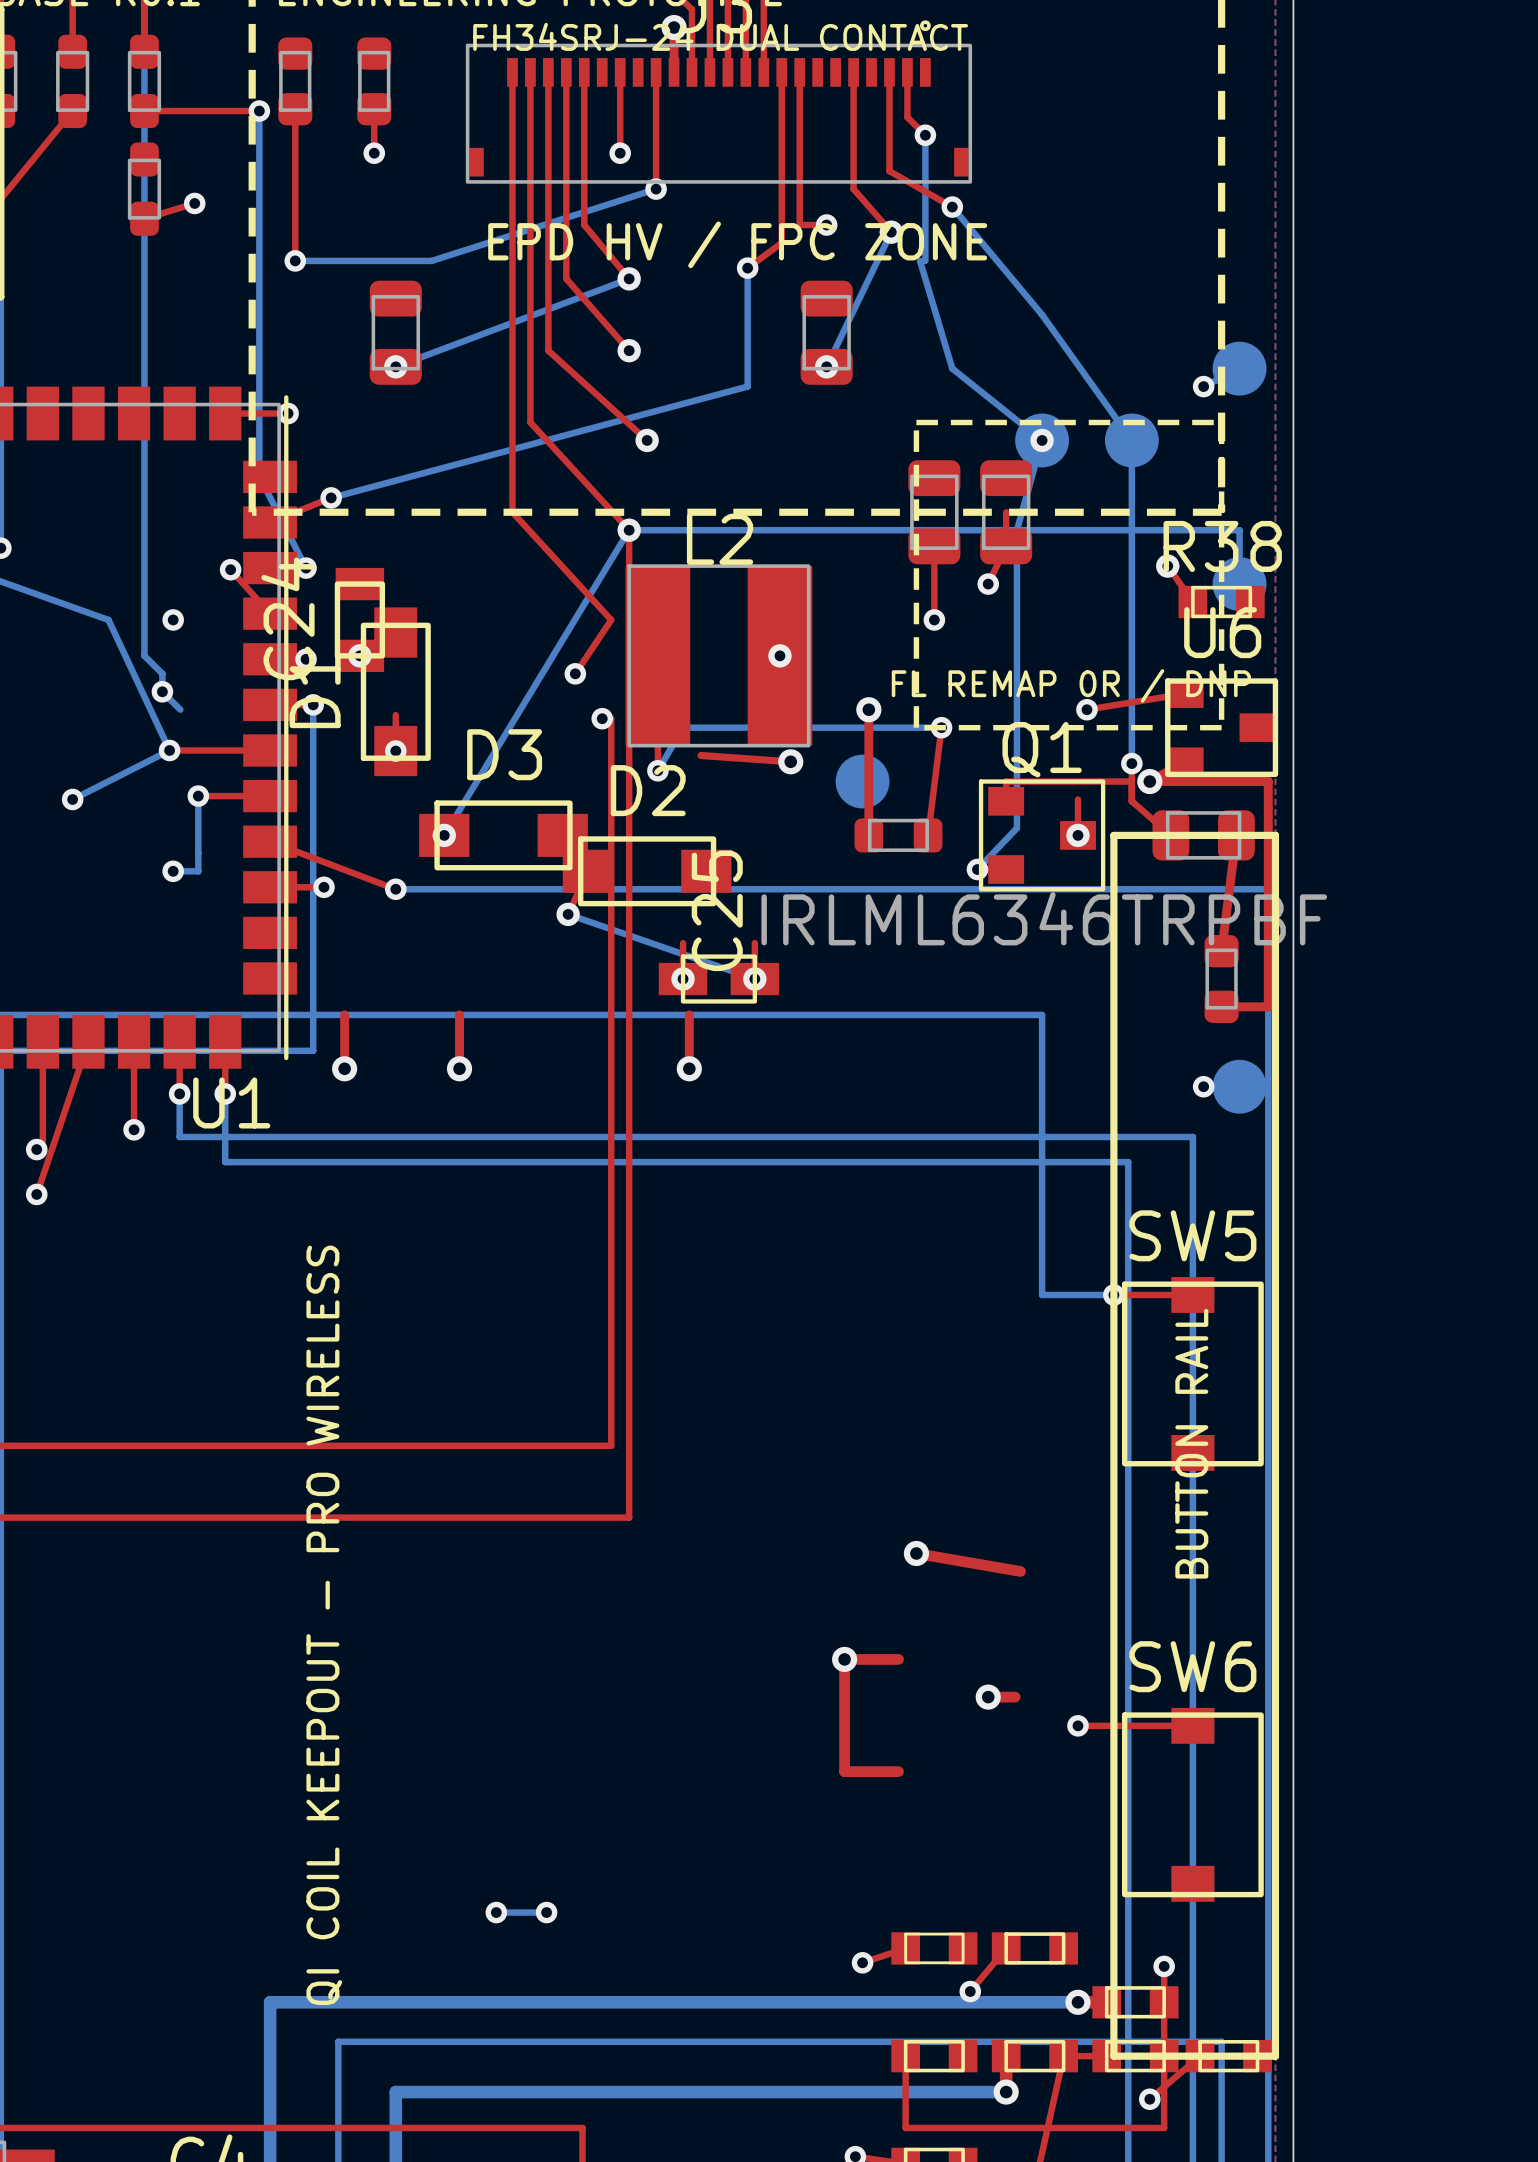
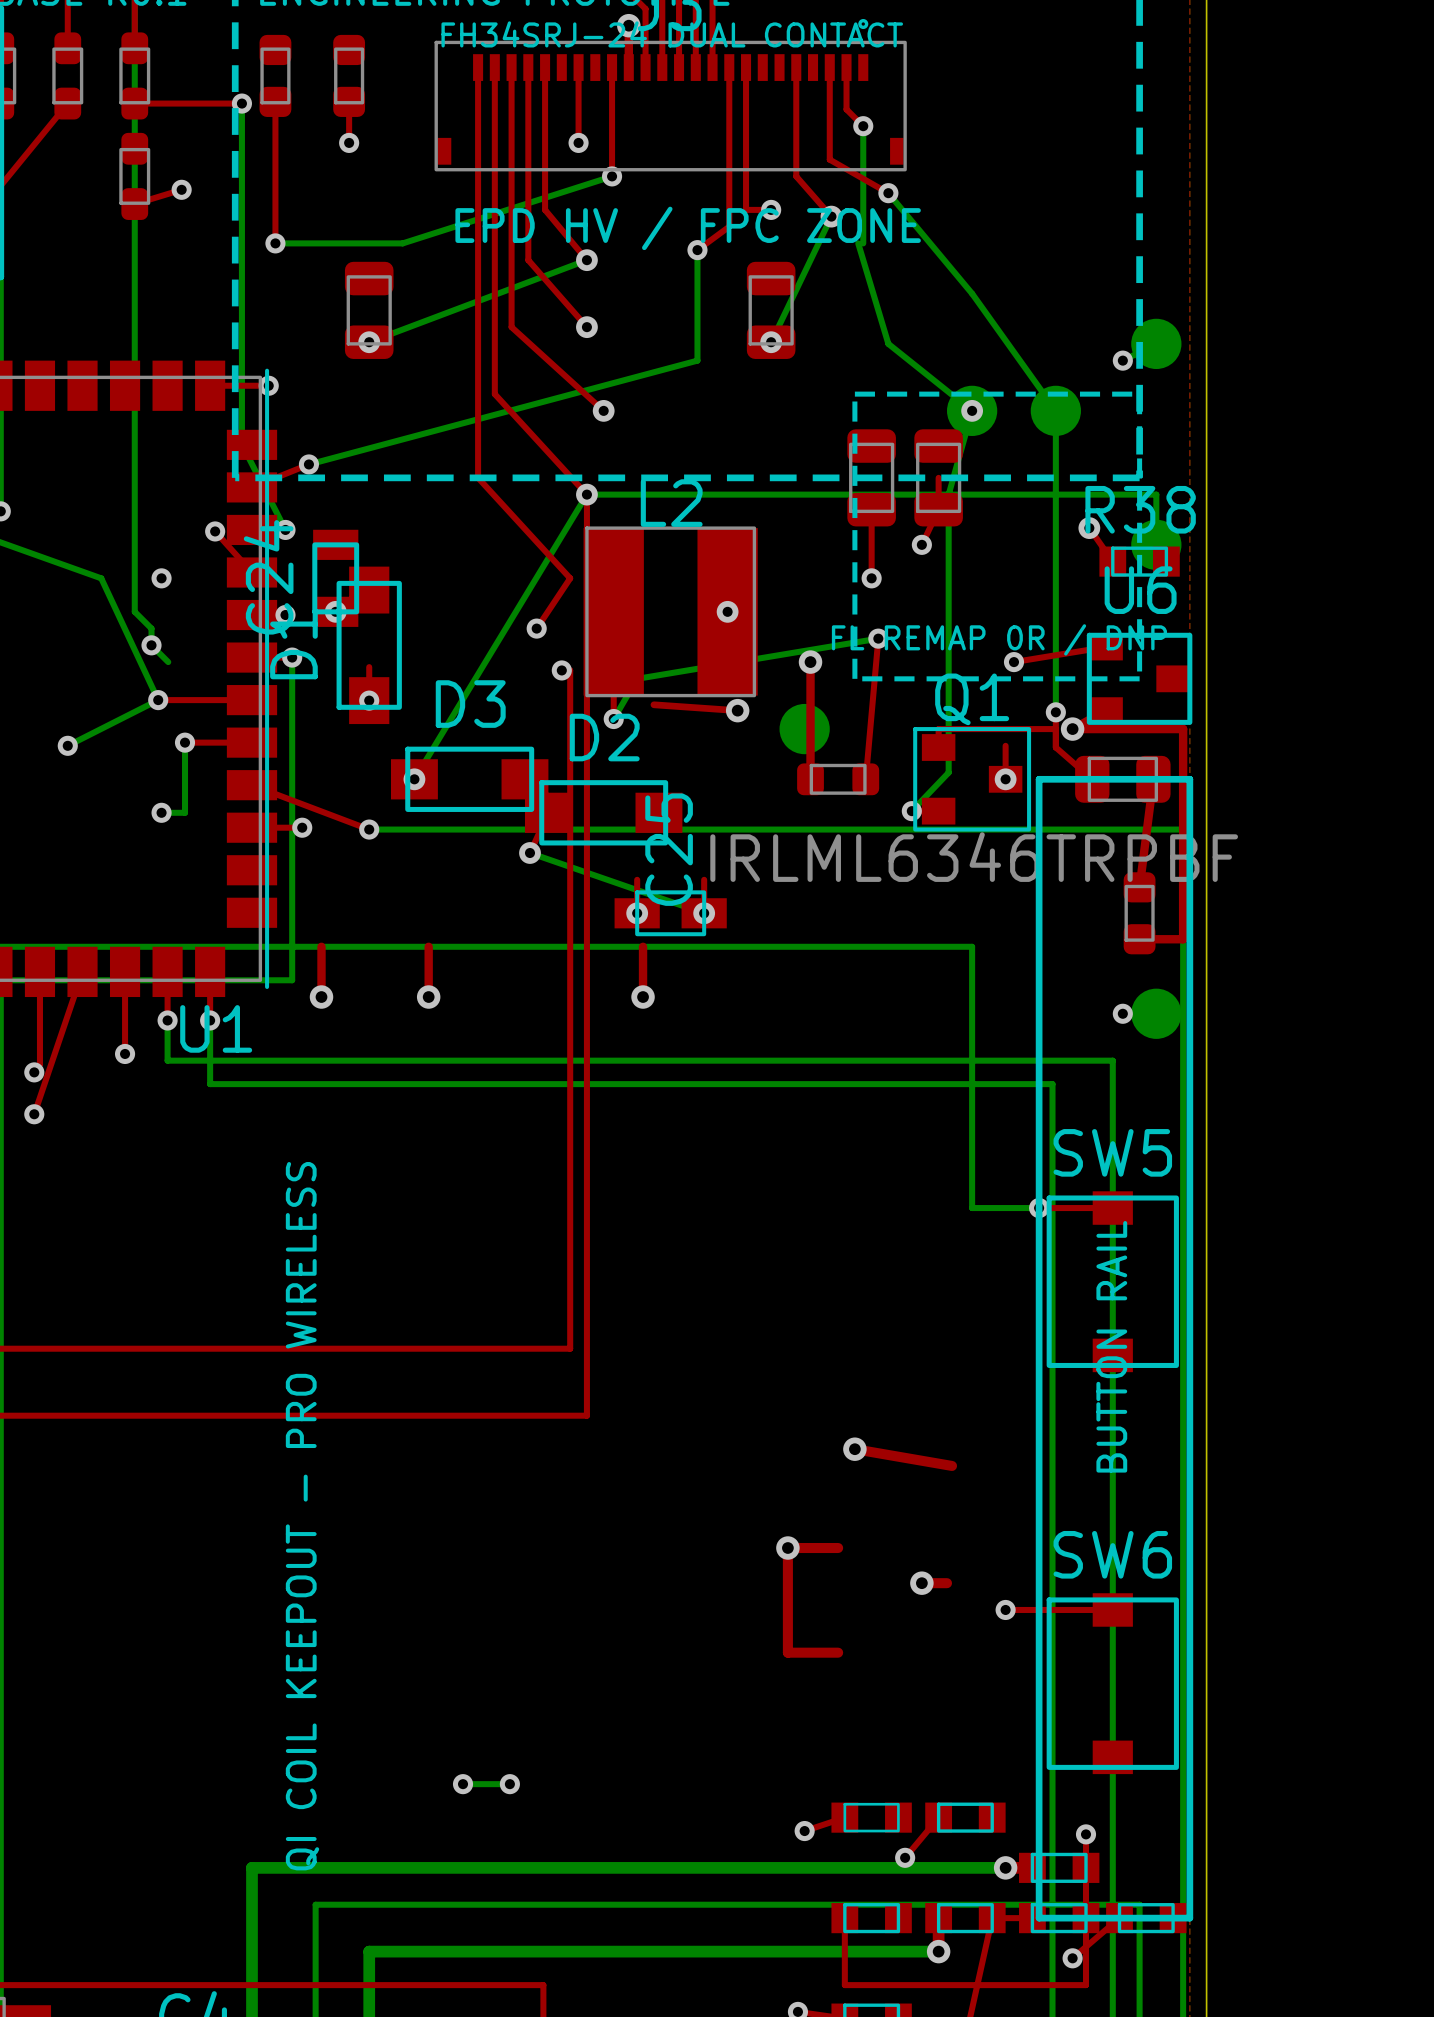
bottom track: (683, 727) (941, 727) -> (637, 678) (878, 638)
top track: (941, 727) (928, 835) -> (878, 638) (865, 779)
via position: (941, 727) -> (878, 638)

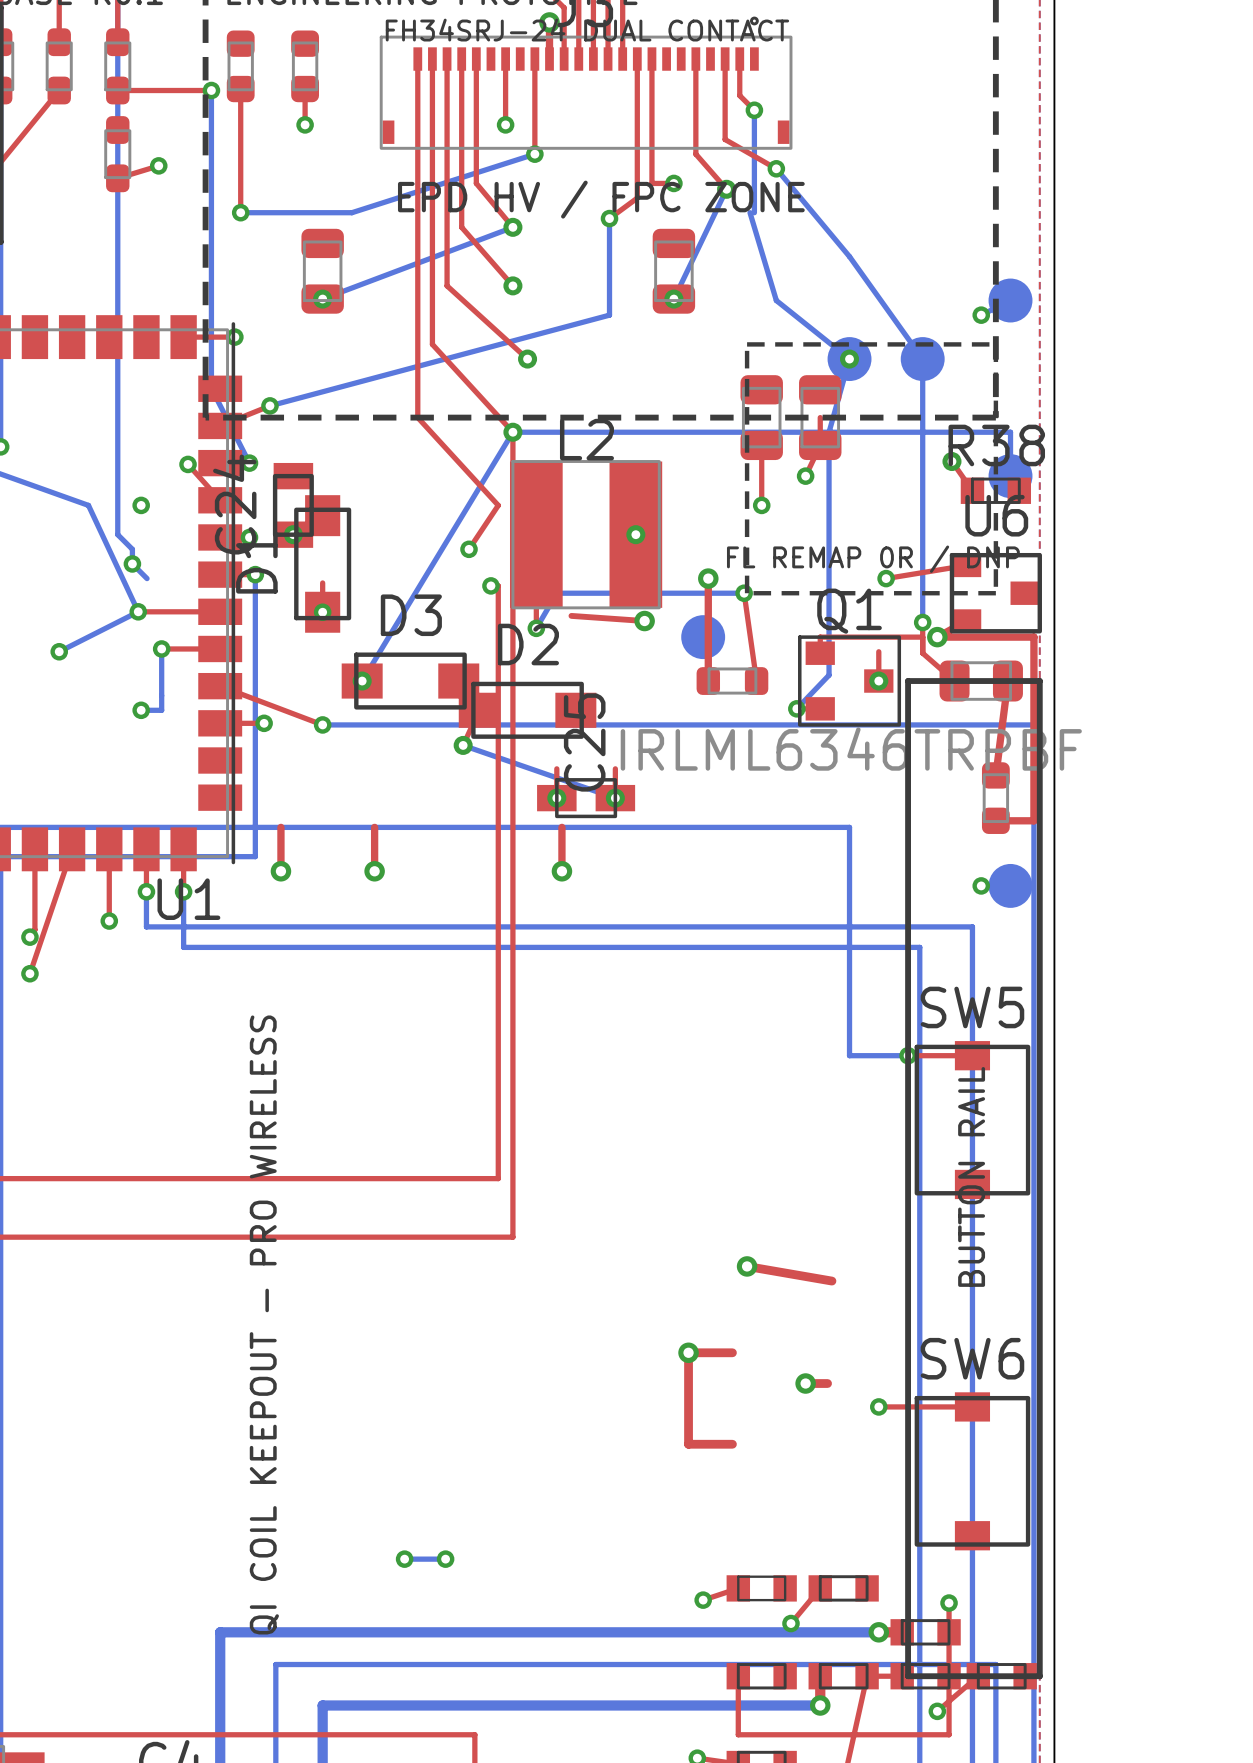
top track: (878, 638) (865, 779) -> (744, 593) (756, 681)
bottom track: (878, 638) (637, 678) -> (744, 593) (556, 593)
via position: (878, 638) -> (744, 593)

